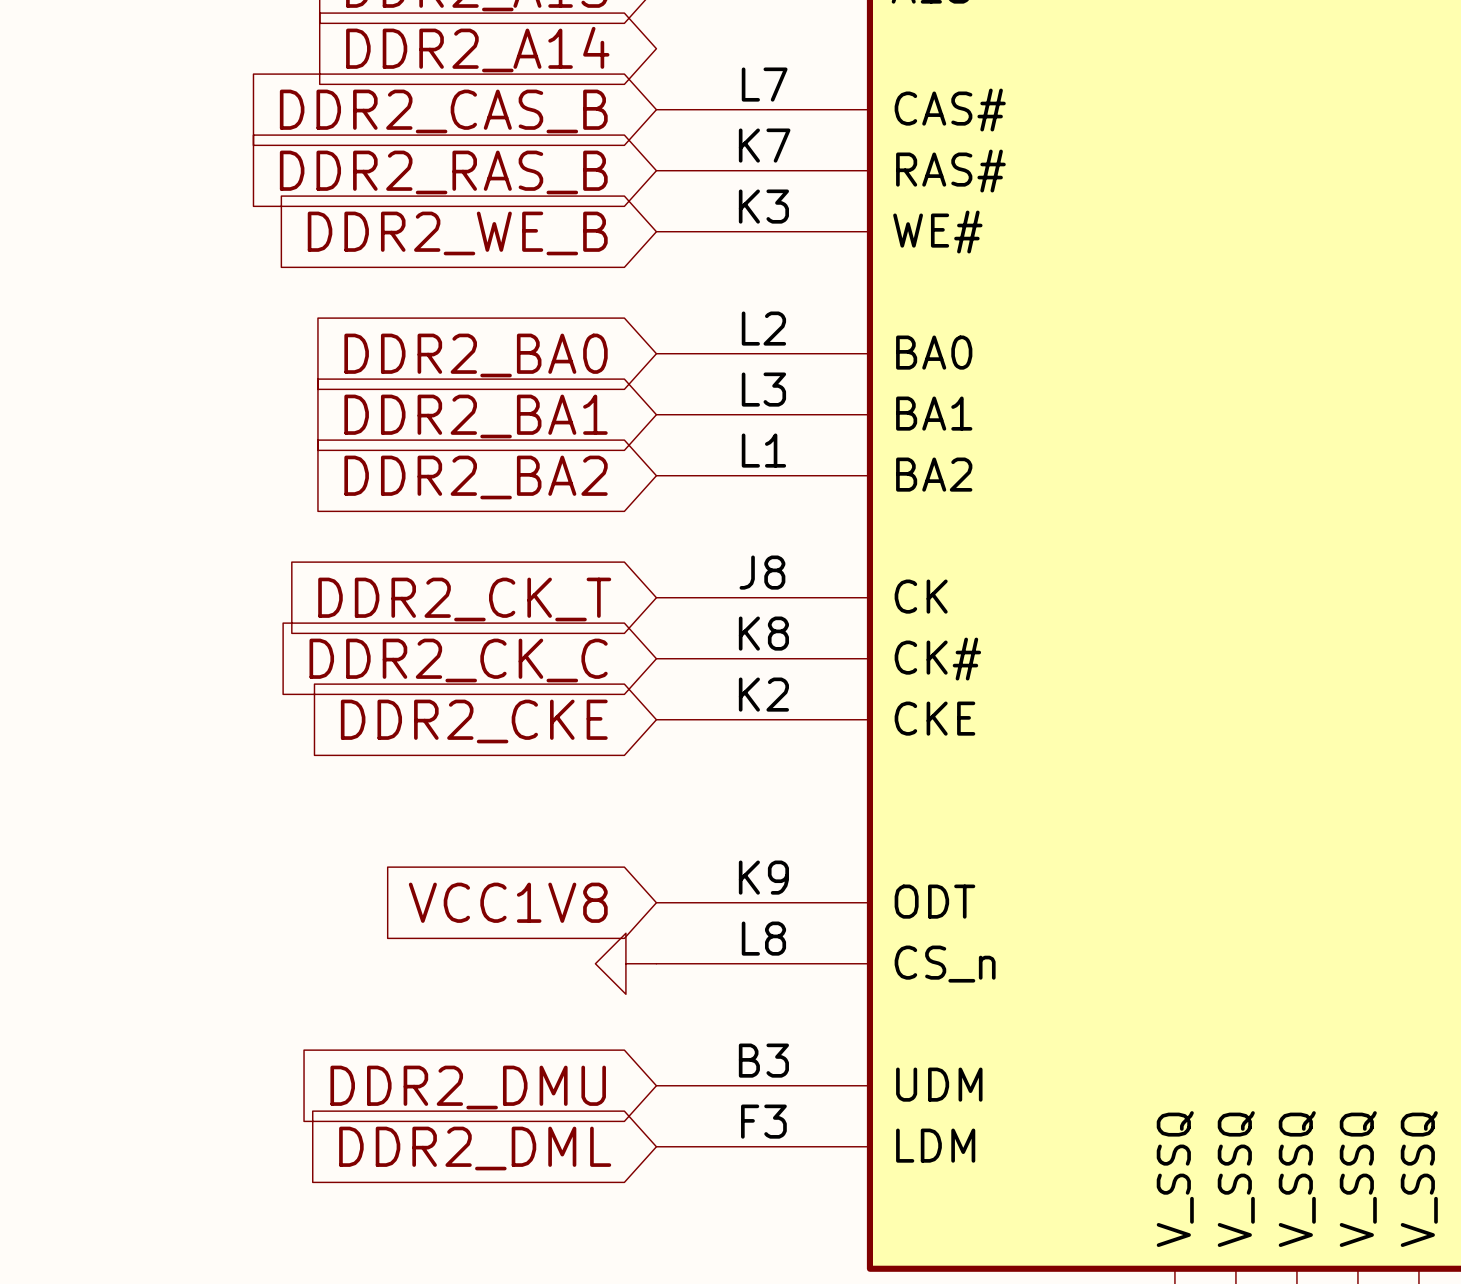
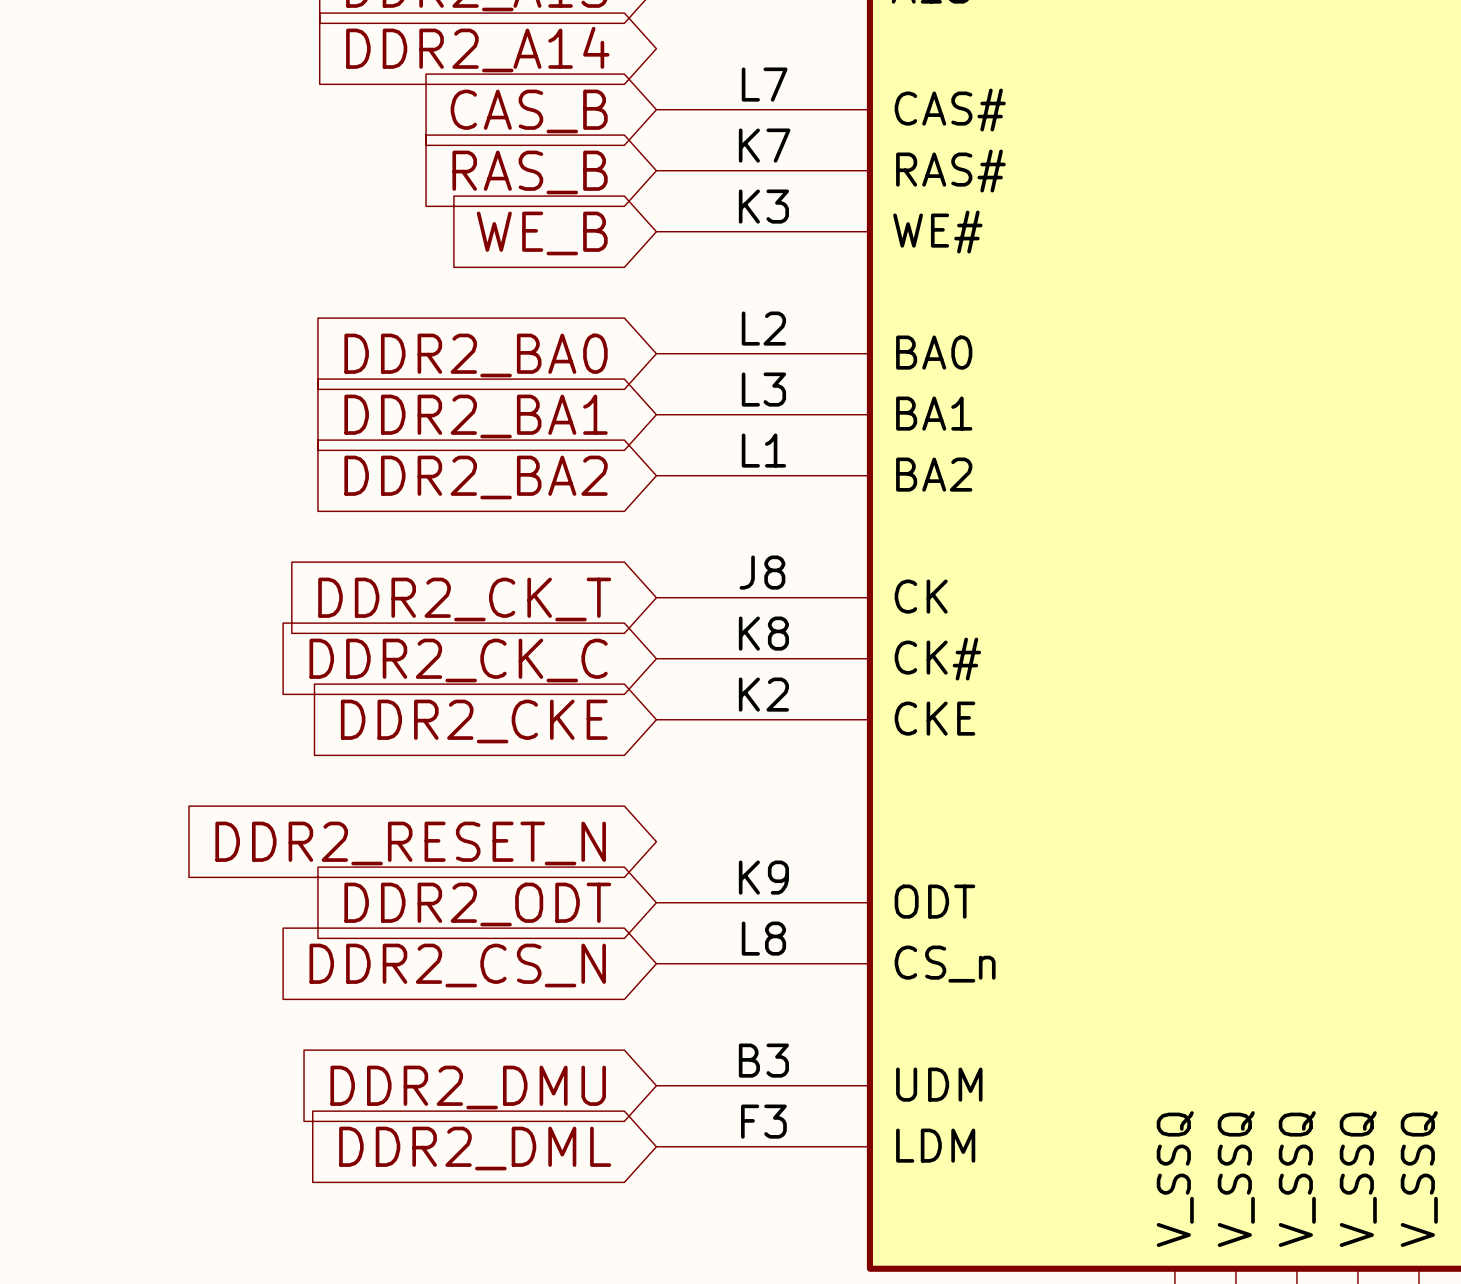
global label: DDR2_CAS_B (443, 111) -> CAS_B (529, 111)
global label: DDR2_RAS_B (443, 172) -> RAS_B (530, 172)
global label: DDR2_WE_B (457, 233) -> WE_B (542, 233)
global label: none -> DDR2_RESET_N (410, 843)
global label: VCC1V8 (508, 902) -> DDR2_ODT (477, 904)
power symbol: (625, 963) -> none
global label: none -> DDR2_CS_N (457, 965)

